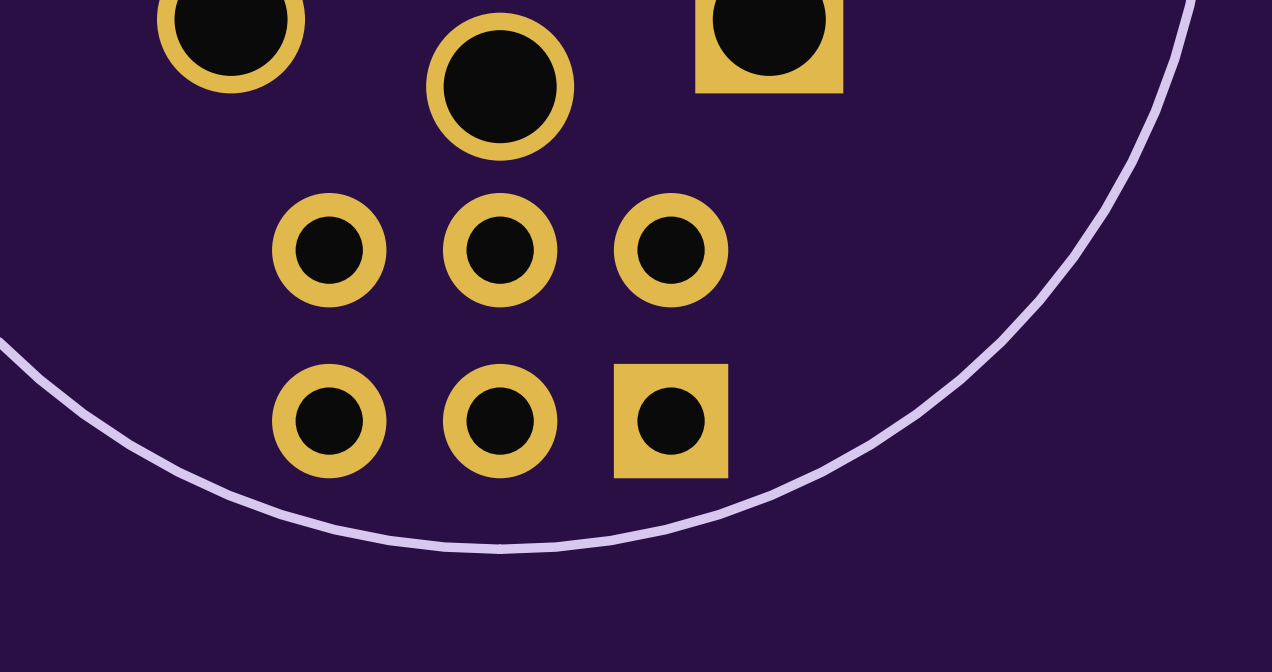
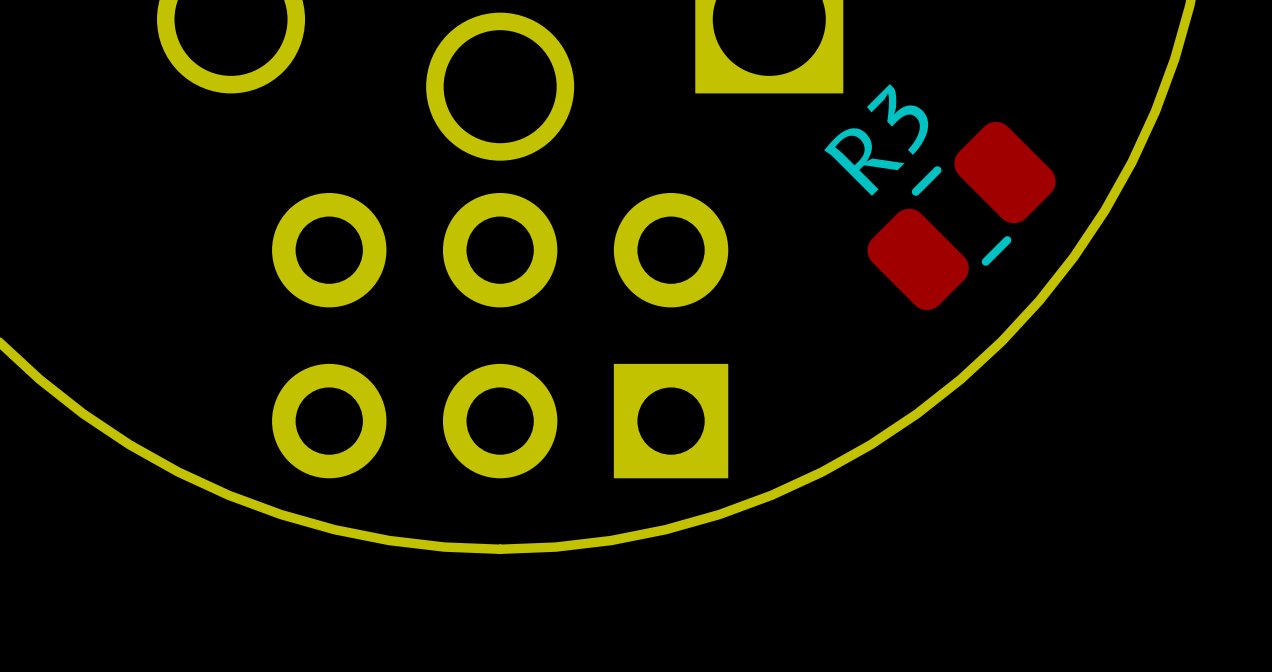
R3: none -> (961, 216)

